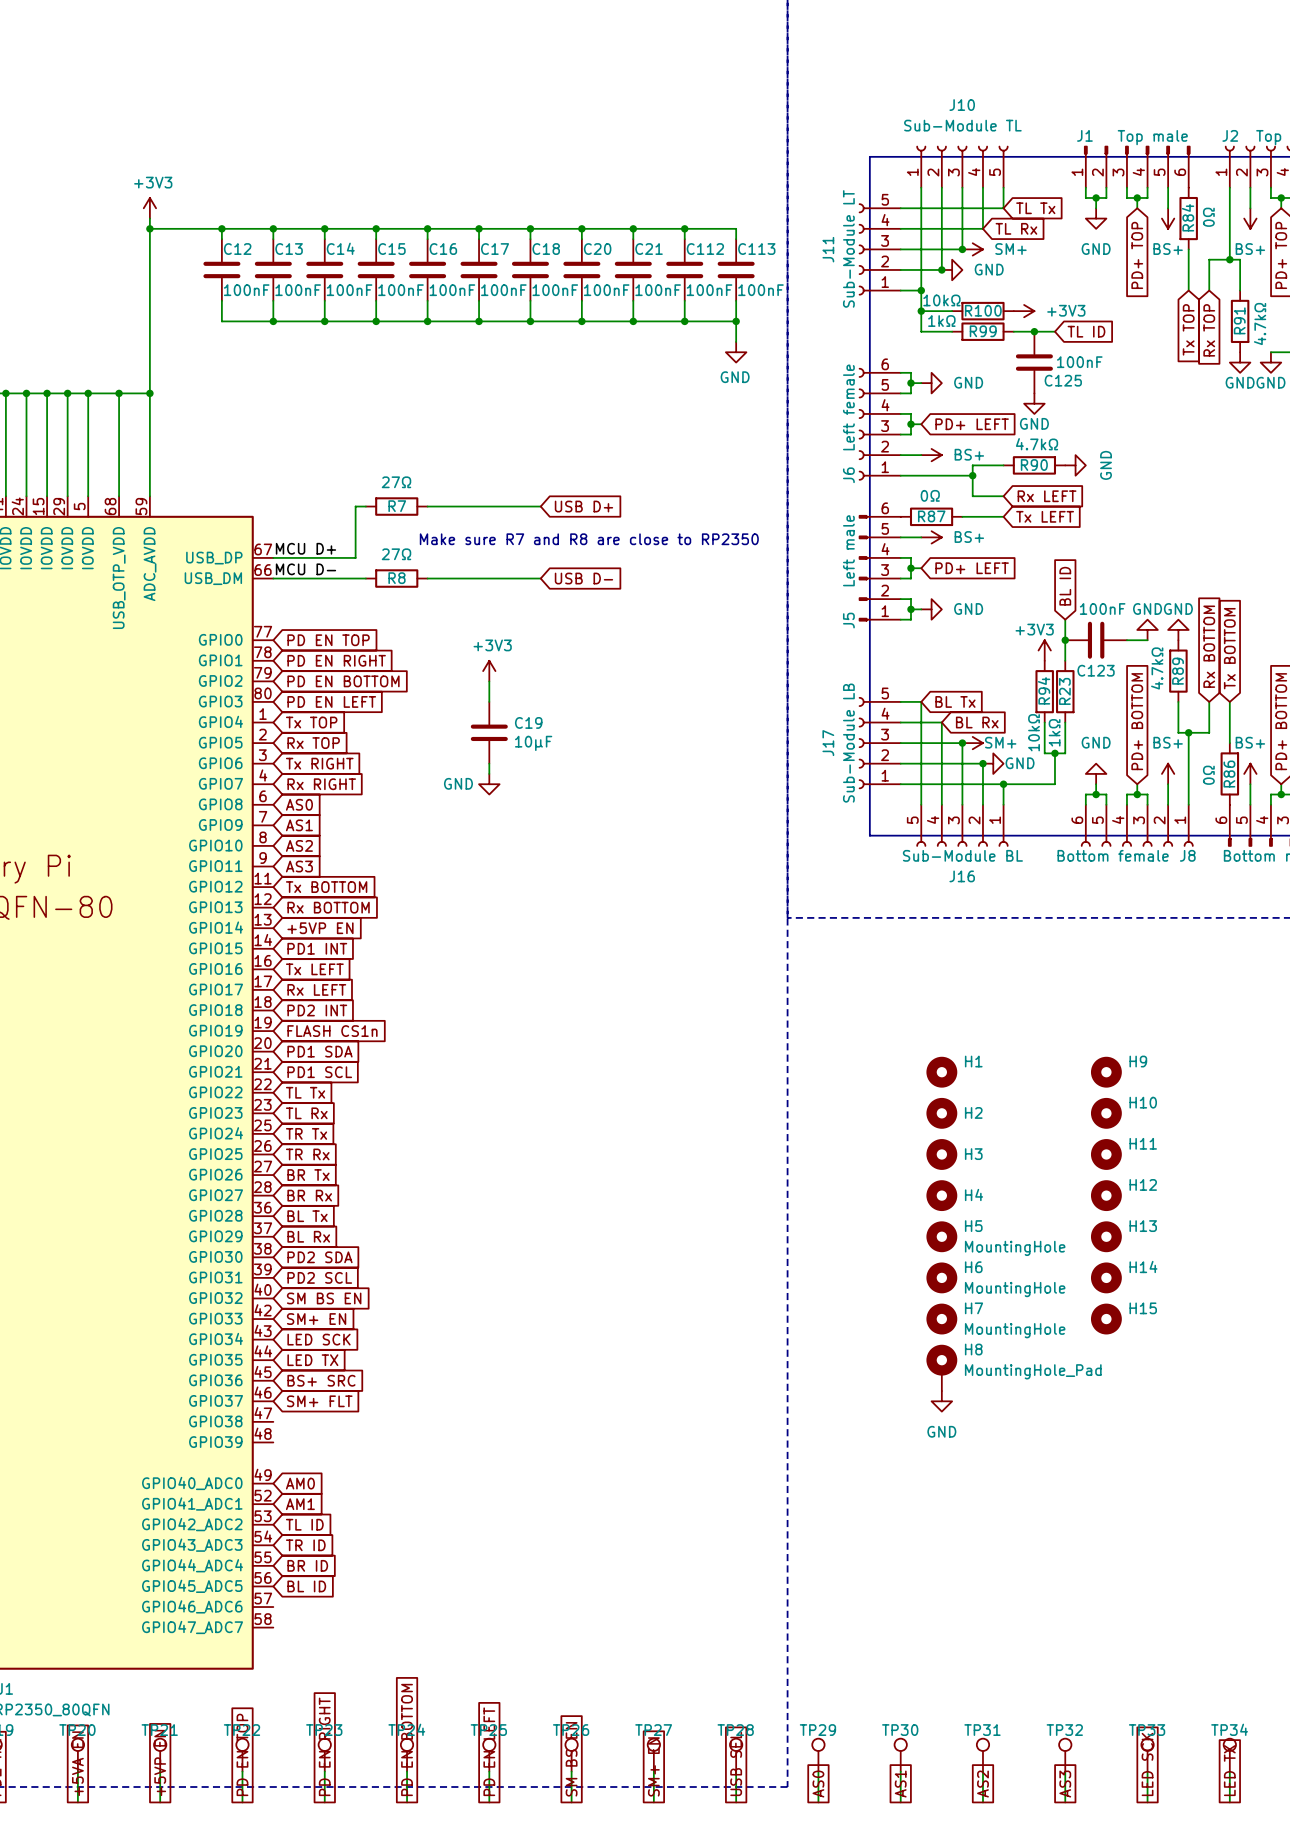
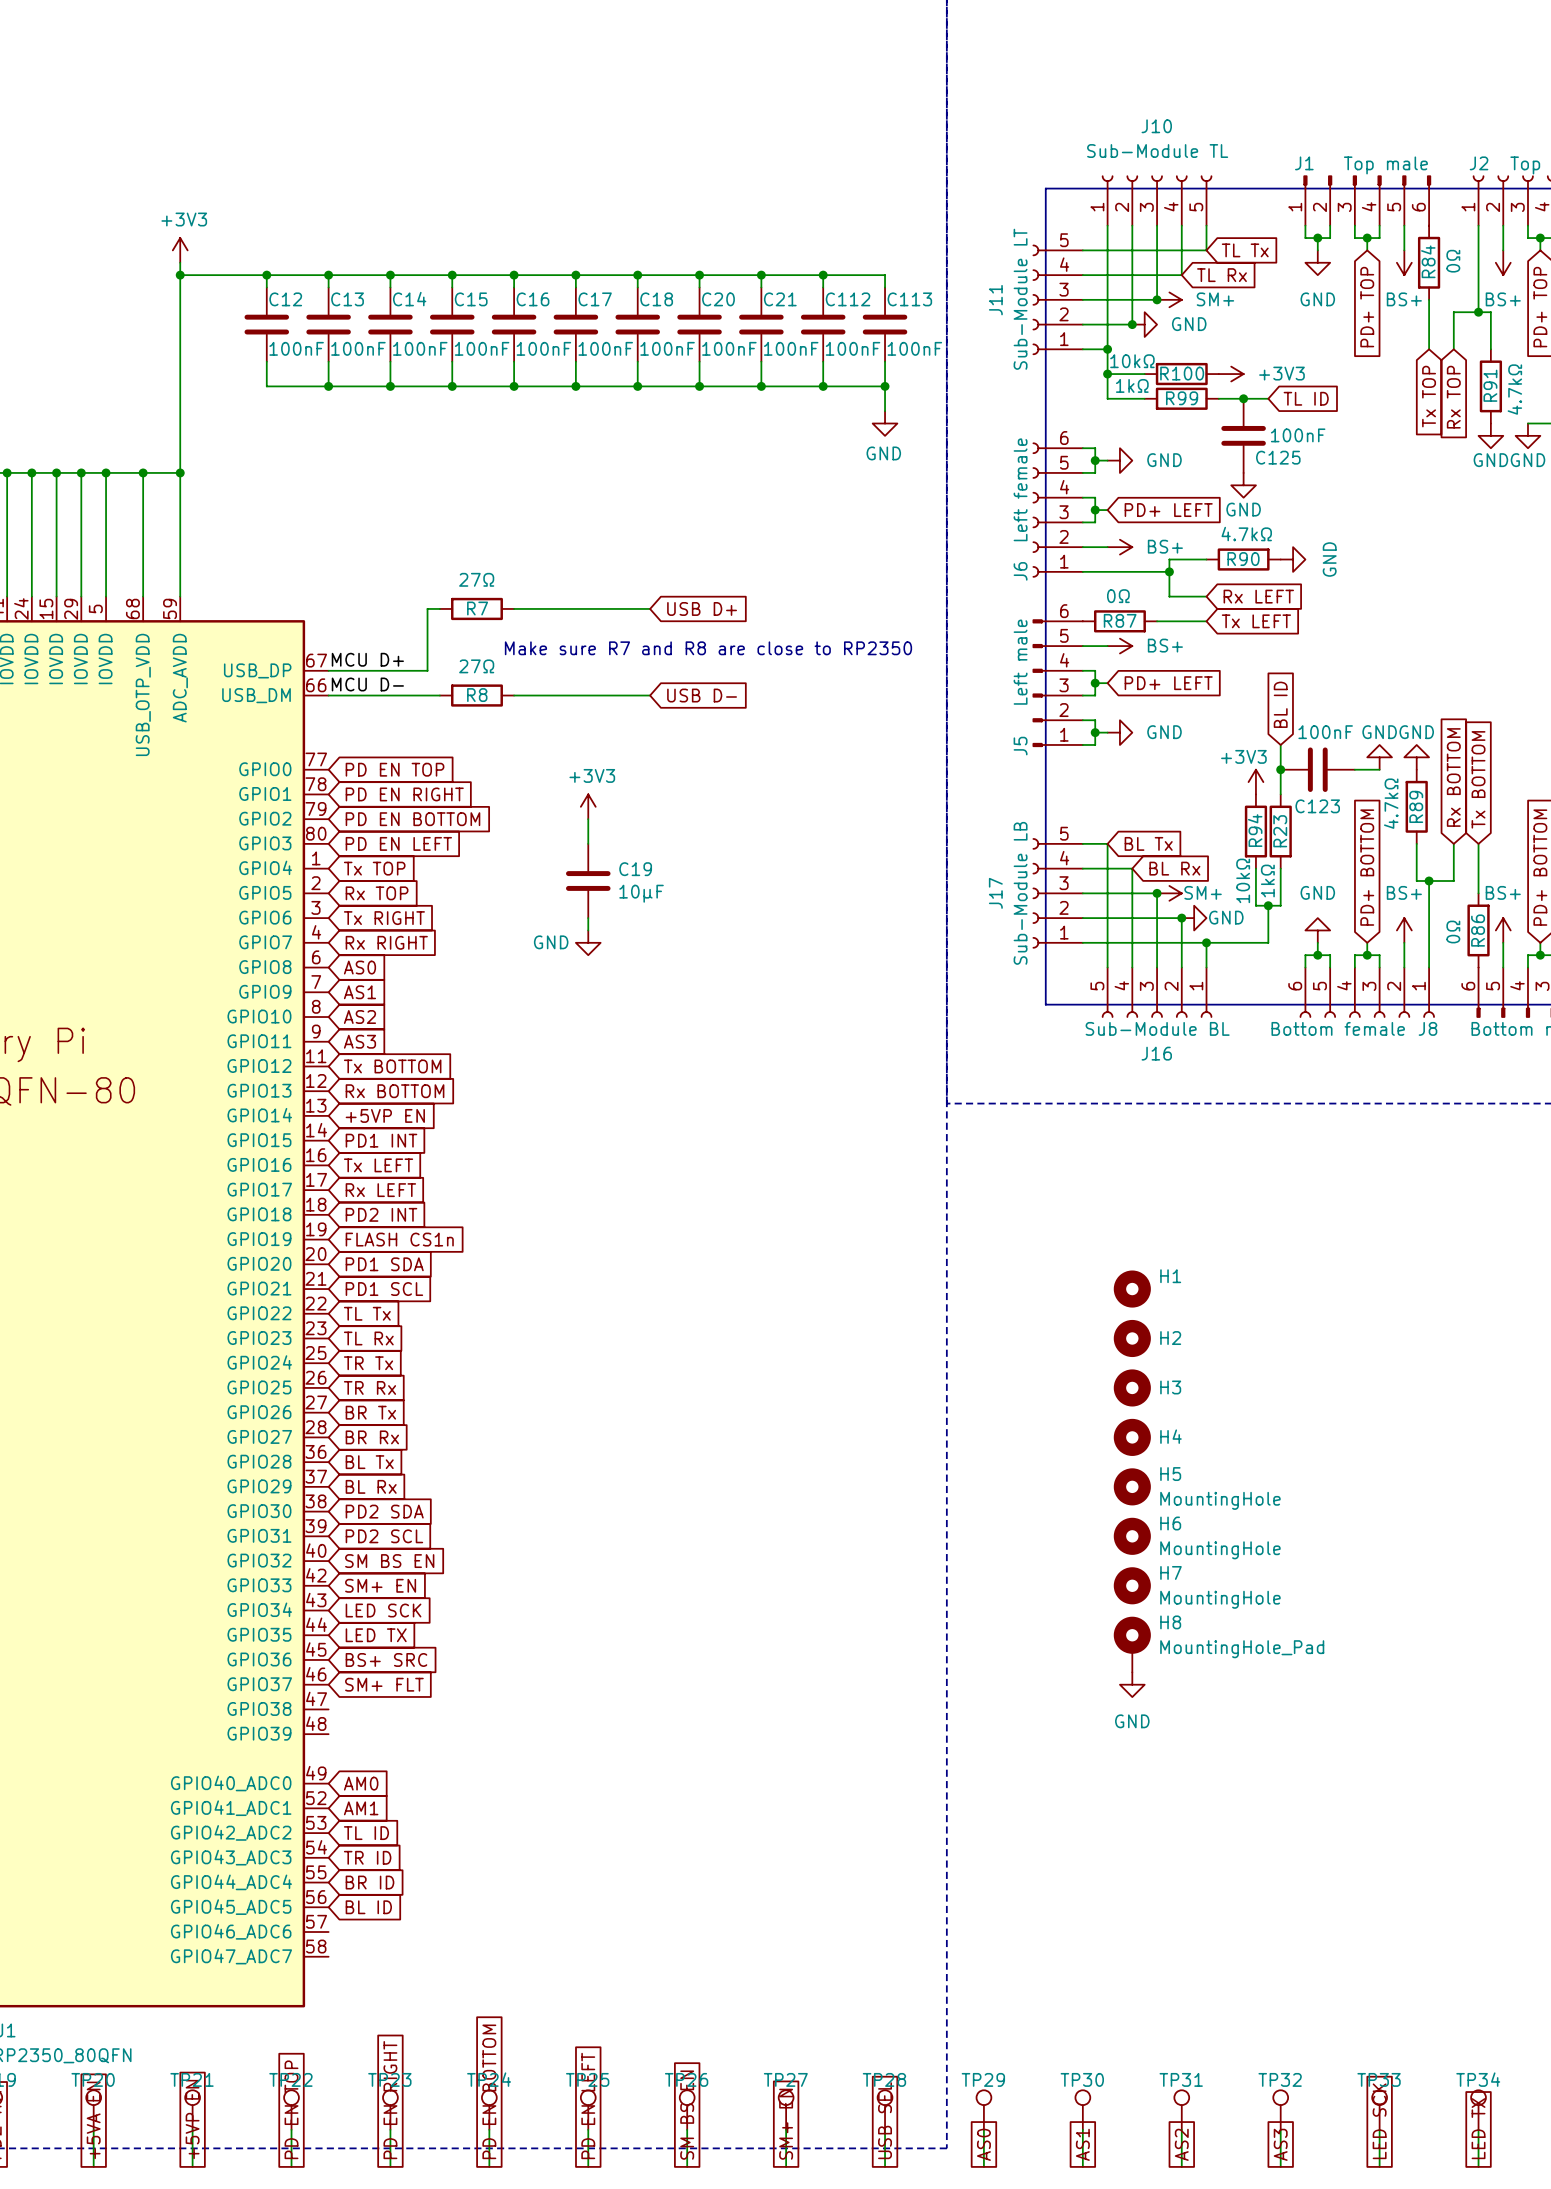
H9: (1106, 1072) -> none
H10: (1106, 1113) -> none
H11: (1106, 1154) -> none
H12: (1106, 1195) -> none
H13: (1106, 1236) -> none
H14: (1106, 1277) -> none
H15: (1106, 1319) -> none

